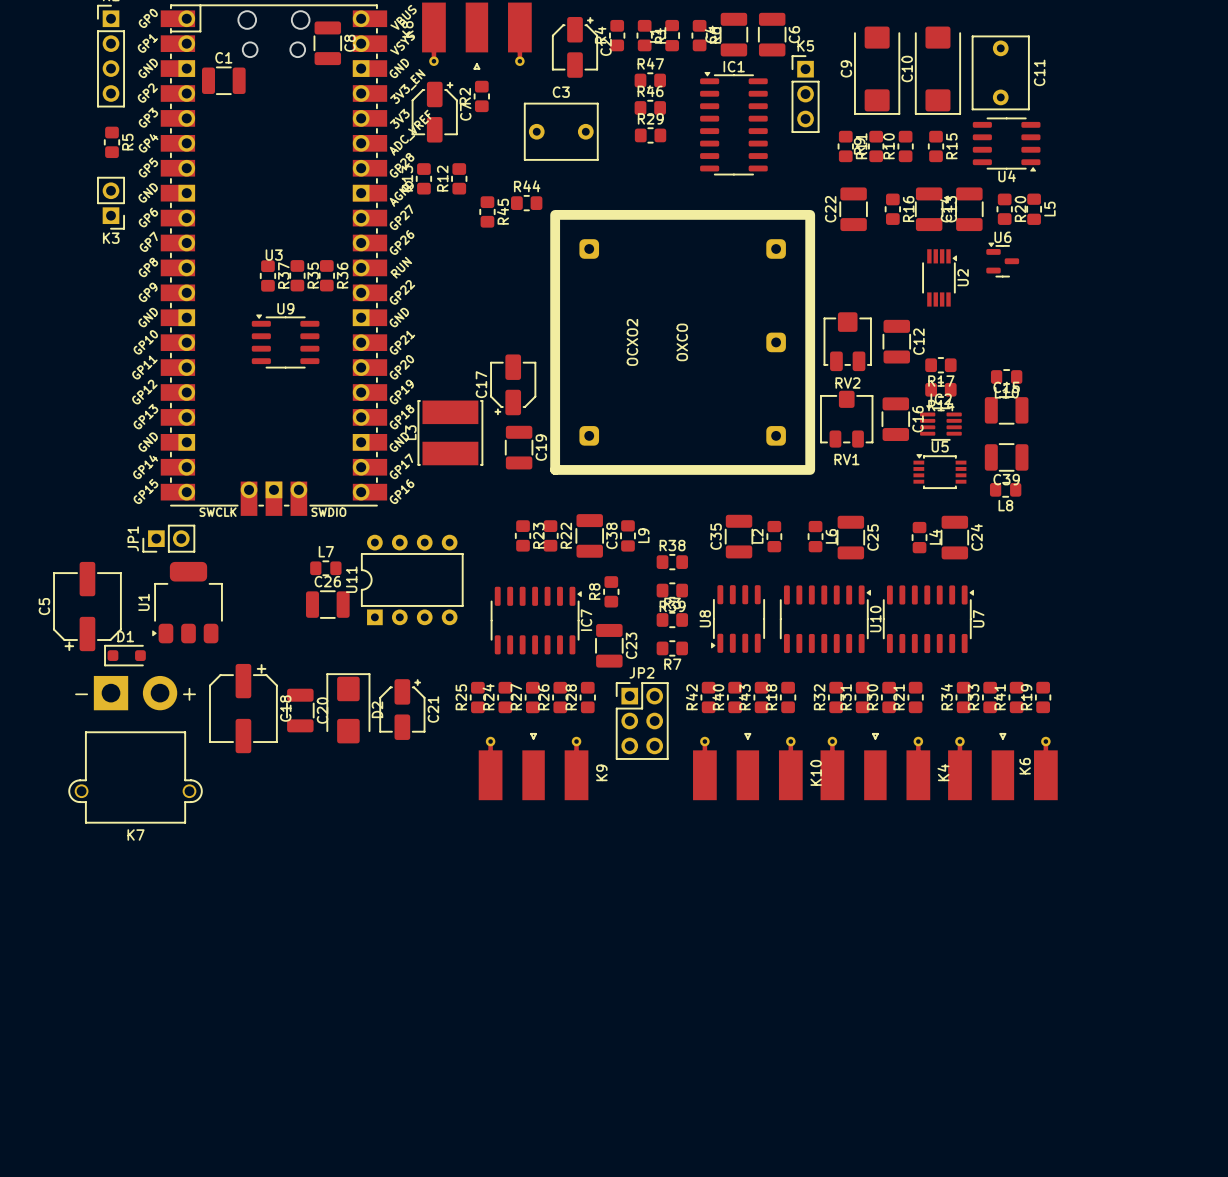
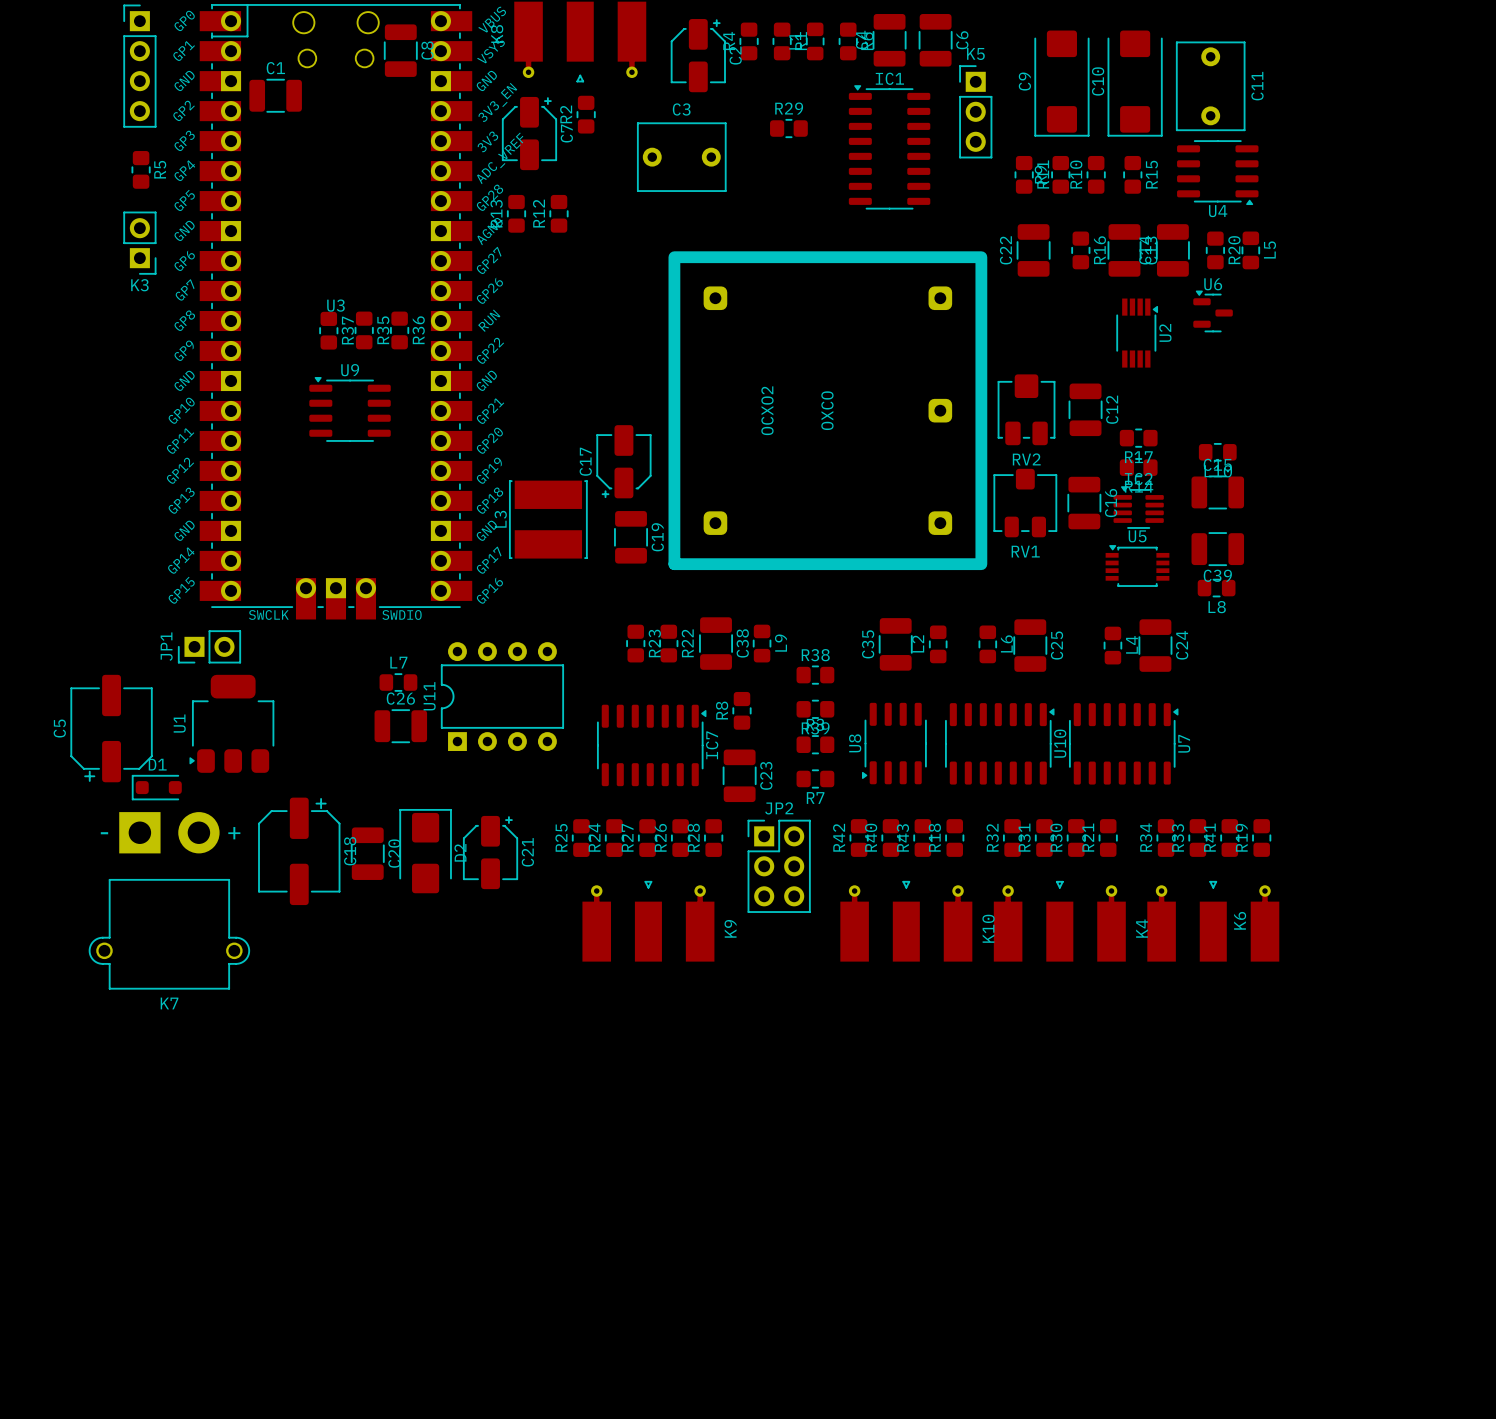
R47: (650, 80) -> none
R46 name: R46 (650, 91) -> R29 (789, 108)
R29: (650, 135) -> none
R44: (526, 203) -> none
R45: (487, 211) -> none

